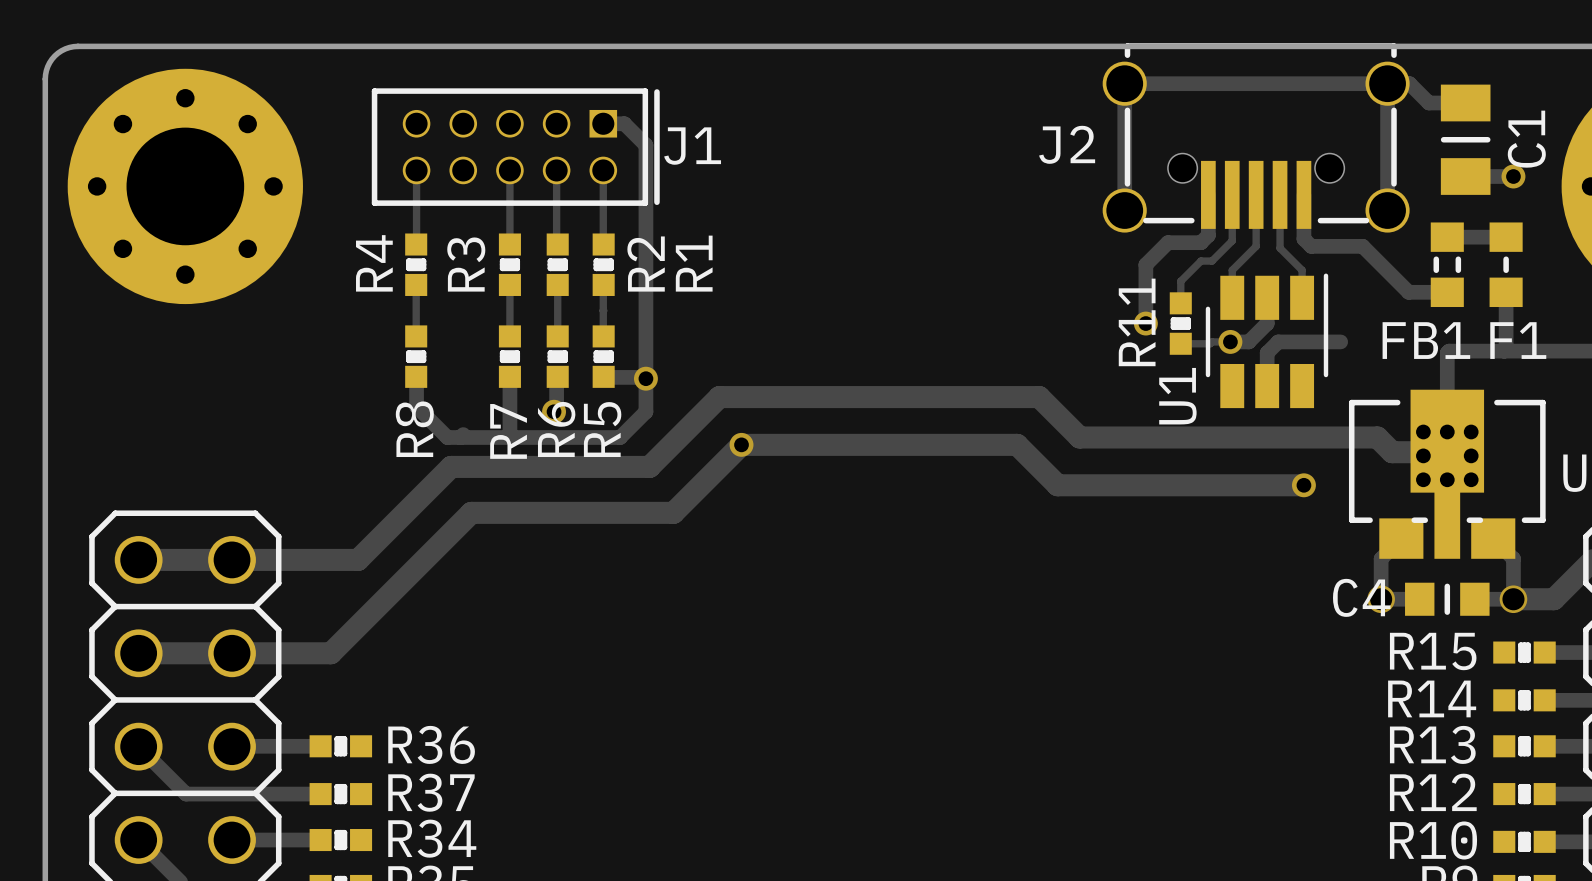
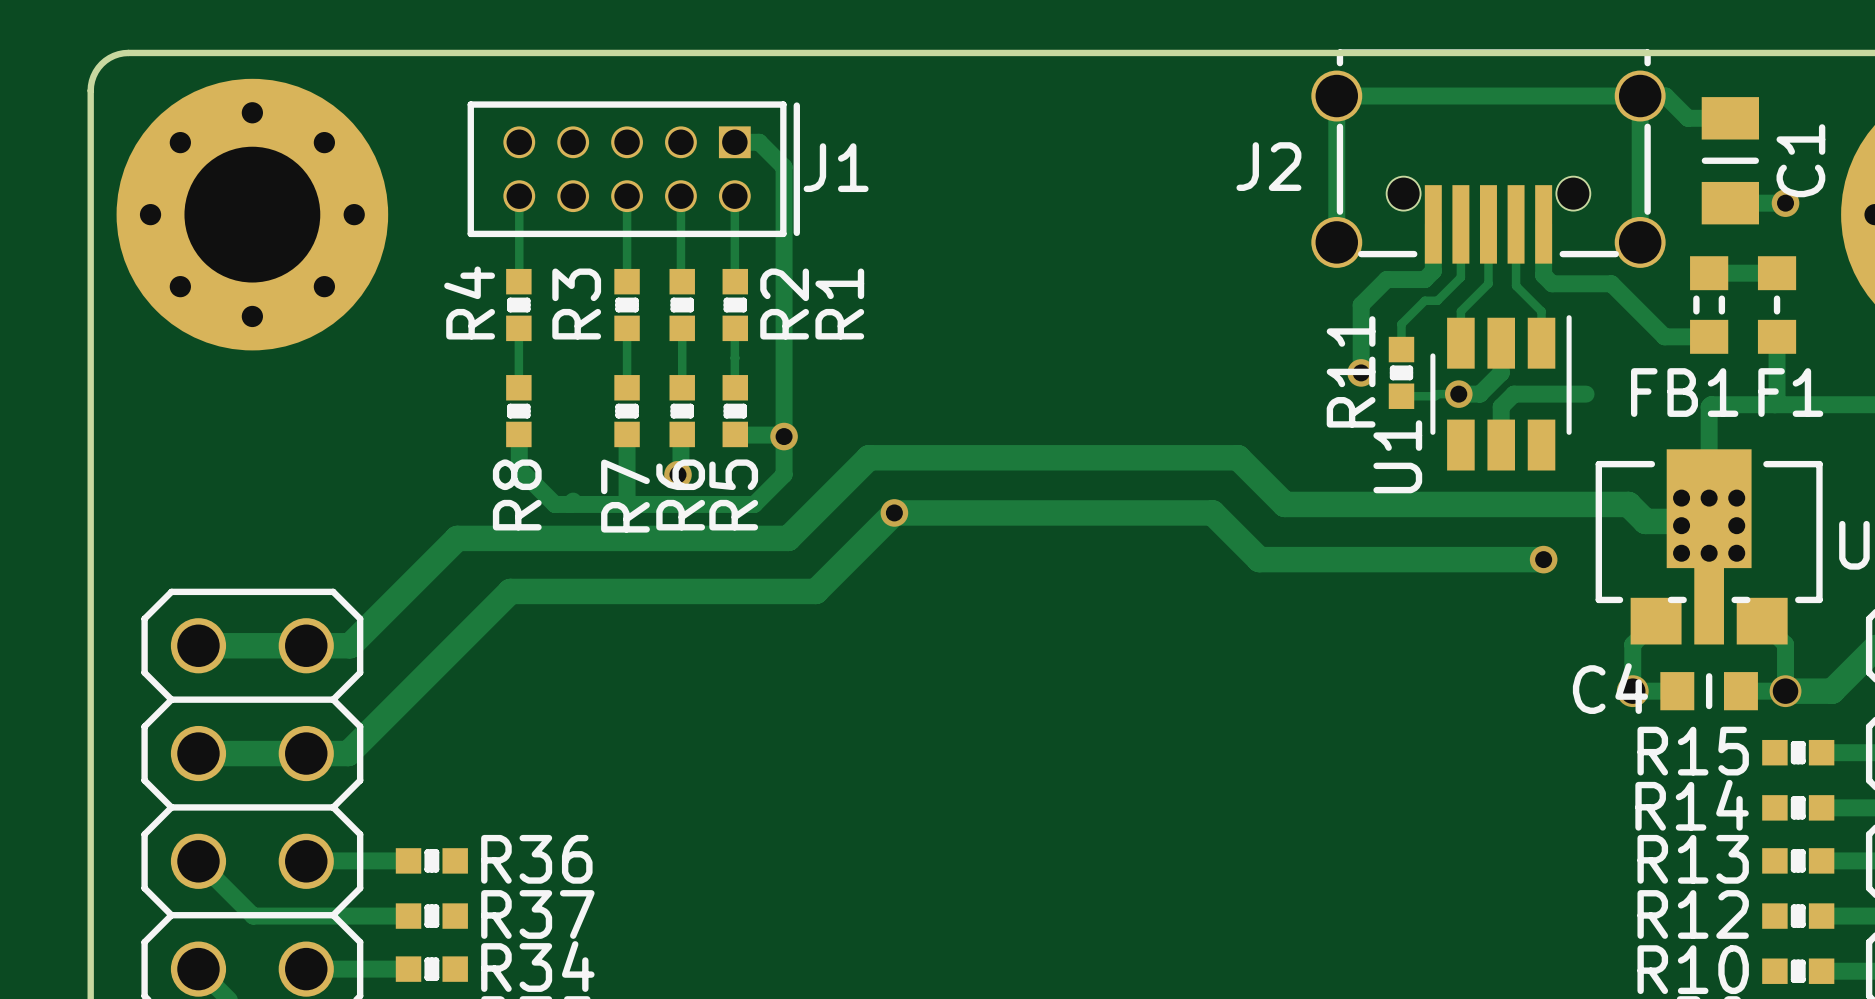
track: (451, 466) (358, 559) (269, 559) -> (559, 538) (457, 538) (349, 645)
track: (471, 512) (330, 653) (268, 653) -> (582, 591) (510, 591) (348, 753)

